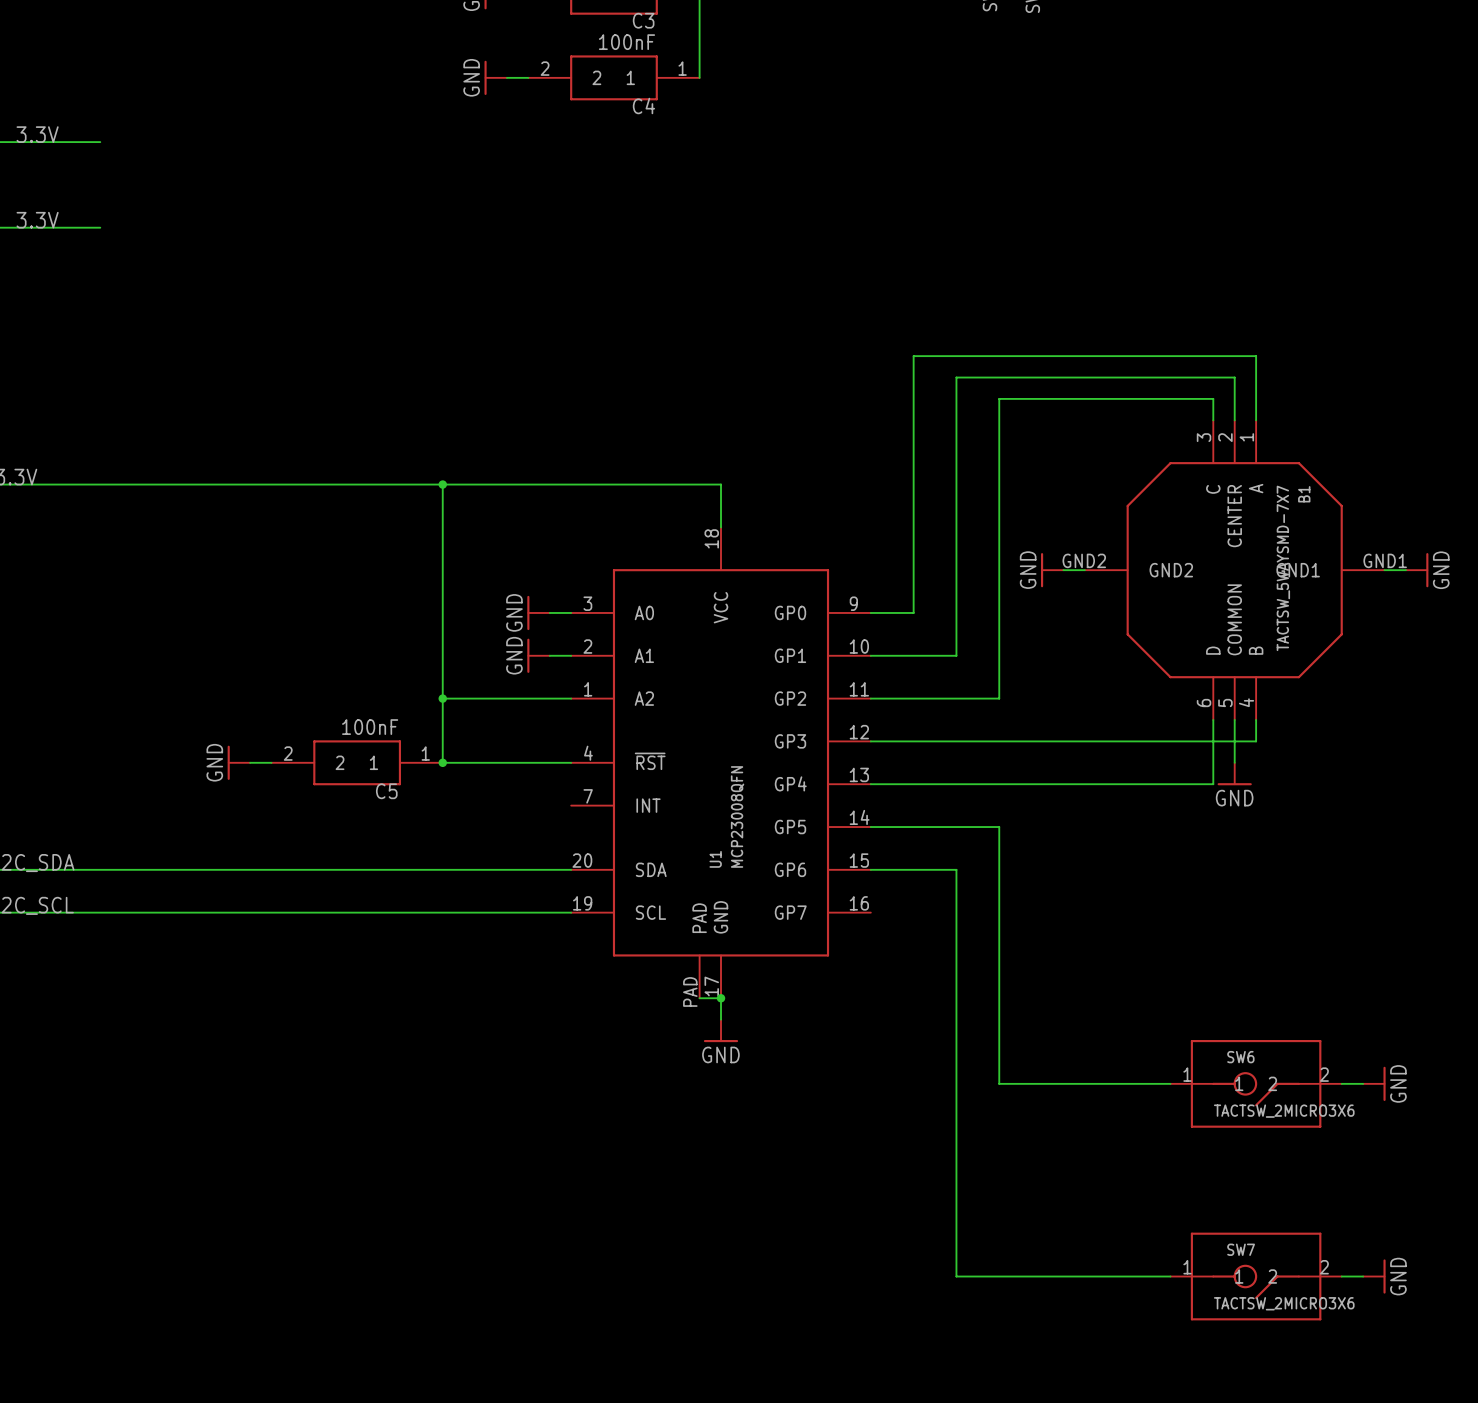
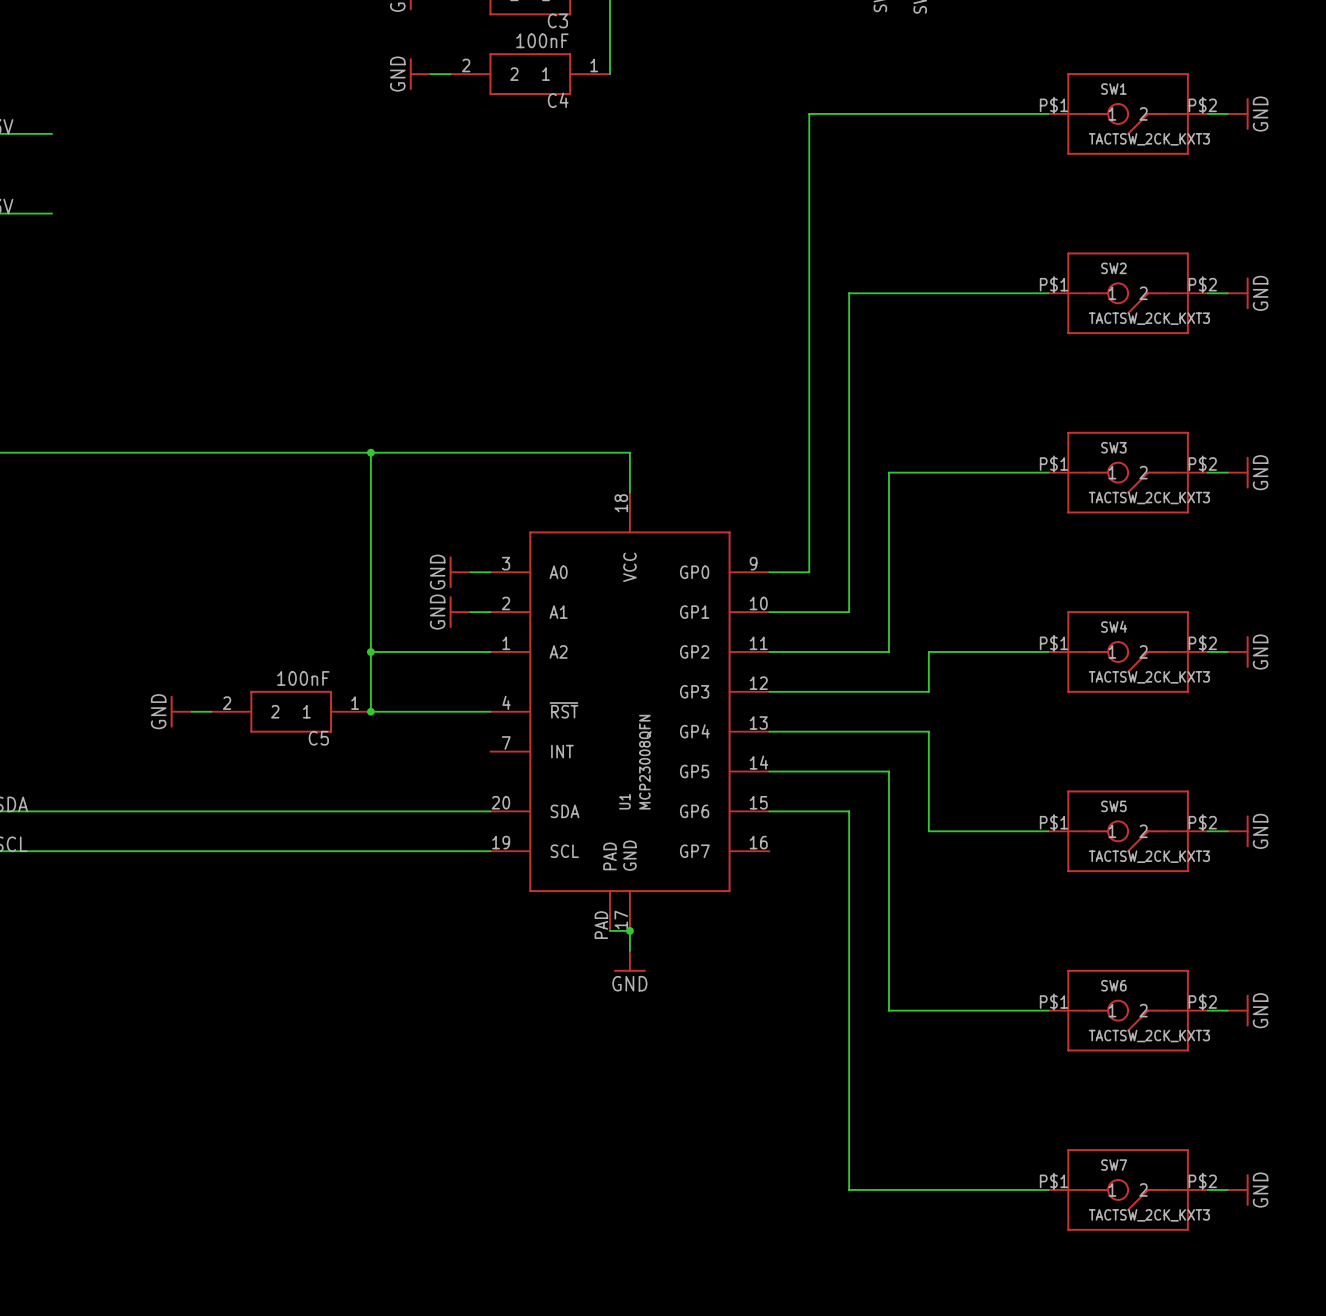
SW1: none -> TACTSW_2CK_KXT3 (1128, 113)
wire: none -> (1207, 113) (1227, 113)
power symbol: none -> GND (1238, 113)
SW2: none -> TACTSW_2CK_KXT3 (1128, 293)
wire: none -> (1207, 293) (1227, 293)
power symbol: none -> GND (1238, 293)
wire: (913, 356) (1256, 356) (1256, 420) -> (809, 333) (809, 113) (1048, 113)
wire: (956, 377) (1234, 377) (1234, 420) -> (849, 353) (849, 293) (1048, 293)
wire: (1213, 420) (1213, 398) (999, 398) (999, 505) -> (1048, 472) (888, 472)
SW3: none -> TACTSW_2CK_KXT3 (1128, 472)
power symbol: none -> GND (1238, 472)
power symbol: GND (1052, 570) -> none
wire: (1063, 570) (1084, 570) -> none
B1: TACTSW_5WAYSMD-7X7 (1234, 570) -> none
wire: (1384, 570) (1405, 570) -> (1207, 472) (1227, 472)
power symbol: GND (1417, 570) -> none
SW4: none -> TACTSW_2CK_KXT3 (1128, 651)
wire: none -> (1207, 651) (1227, 651)
power symbol: none -> GND (1238, 651)
wire: (1213, 720) (1213, 784) (1042, 784) -> (1048, 831) (928, 831) (928, 731)
wire: (1234, 720) (1234, 762) -> none
wire: (1256, 720) (1256, 741) (1042, 741) -> (1048, 651) (928, 651) (928, 691)
power symbol: GND (1234, 774) -> none
SW5: none -> TACTSW_2CK_KXT3 (1128, 831)
wire: none -> (1207, 831) (1227, 831)
power symbol: none -> GND (1238, 831)
SW6 pin number: 1 (1187, 1074) -> P$1 (1053, 1002)
SW6 pin number: 2 (1324, 1074) -> P$2 (1202, 1002)
SW6 value: TACTSW_2MICRO3X6 (1284, 1111) -> TACTSW_2CK_KXT3 (1149, 1036)
SW7 pin number: 1 (1187, 1267) -> P$1 (1053, 1181)
SW7 pin number: 2 (1324, 1267) -> P$2 (1202, 1181)
SW7 value: TACTSW_2MICRO3X6 (1284, 1303) -> TACTSW_2CK_KXT3 (1149, 1215)

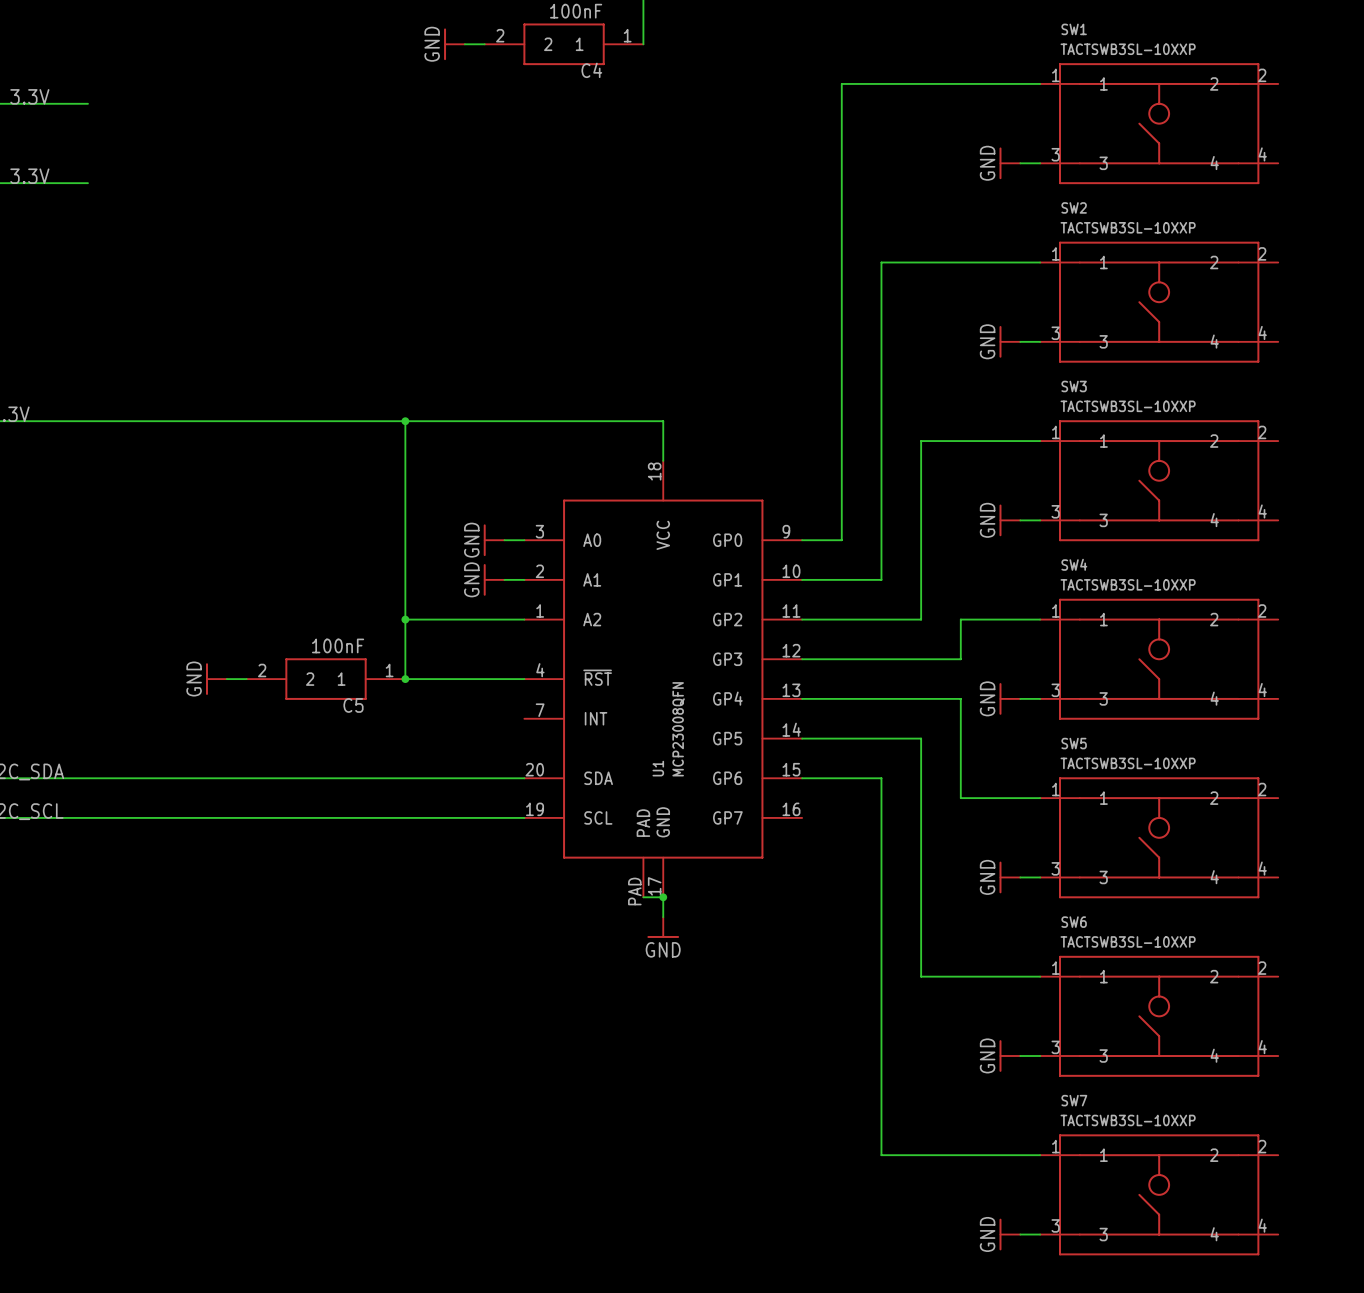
SW1 symbol: [1048, 73, 1208, 155] -> [1040, 63, 1279, 185]
SW1 name position: SW1 (1113, 89) -> SW1 (1074, 29)
power symbol: GND (1238, 113) -> none
SW1 value: TACTSW_2CK_KXT3 (1149, 139) -> TACTSWB3SL-10XXP (1128, 49)
power symbol: none -> GND (1009, 163)
wire: none -> (1020, 163) (1040, 163)
SW2 symbol: [1048, 252, 1208, 335] -> [1040, 241, 1279, 363]
SW2 name position: SW2 (1113, 268) -> SW2 (1074, 207)
power symbol: GND (1238, 293) -> none
SW2 value: TACTSW_2CK_KXT3 (1149, 318) -> TACTSWB3SL-10XXP (1128, 227)
power symbol: none -> GND (1009, 341)
wire: none -> (1020, 341) (1040, 341)
SW3 symbol: [1048, 431, 1208, 514] -> [1040, 420, 1279, 542]
SW3 name position: SW3 (1113, 447) -> SW3 (1074, 386)
power symbol: GND (1238, 472) -> none
SW3 value: TACTSW_2CK_KXT3 (1149, 498) -> TACTSWB3SL-10XXP (1128, 406)
power symbol: none -> GND (1009, 520)
wire: none -> (1020, 520) (1040, 520)
SW4 symbol: [1048, 611, 1208, 693] -> [1040, 598, 1279, 720]
SW4 name position: SW4 (1114, 626) -> SW4 (1074, 564)
power symbol: GND (1238, 651) -> none
SW4 value: TACTSW_2CK_KXT3 (1149, 677) -> TACTSWB3SL-10XXP (1128, 584)
power symbol: none -> GND (1009, 698)
wire: none -> (1020, 698) (1040, 698)
SW5 symbol: [1048, 790, 1208, 873] -> [1040, 777, 1279, 899]
SW5 name position: SW5 (1113, 806) -> SW5 (1074, 743)
power symbol: GND (1238, 831) -> none
SW5 value: TACTSW_2CK_KXT3 (1149, 856) -> TACTSWB3SL-10XXP (1128, 763)
power symbol: none -> GND (1009, 877)
wire: none -> (1020, 877) (1040, 877)
SW6 symbol: [1048, 969, 1208, 1052] -> [1040, 955, 1279, 1077]
SW6 name position: SW6 (1113, 985) -> SW6 (1074, 922)
power symbol: GND (1238, 1010) -> none
SW6 value: TACTSW_2CK_KXT3 (1149, 1036) -> TACTSWB3SL-10XXP (1128, 941)
power symbol: none -> GND (1009, 1056)
wire: none -> (1020, 1056) (1040, 1056)
SW7 symbol: [1048, 1149, 1208, 1231] -> [1040, 1134, 1279, 1256]
SW7 name position: SW7 (1114, 1165) -> SW7 (1074, 1100)
power symbol: GND (1238, 1189) -> none
SW7 value: TACTSW_2CK_KXT3 (1149, 1215) -> TACTSWB3SL-10XXP (1128, 1120)
power symbol: none -> GND (1009, 1234)
wire: none -> (1020, 1234) (1040, 1234)

